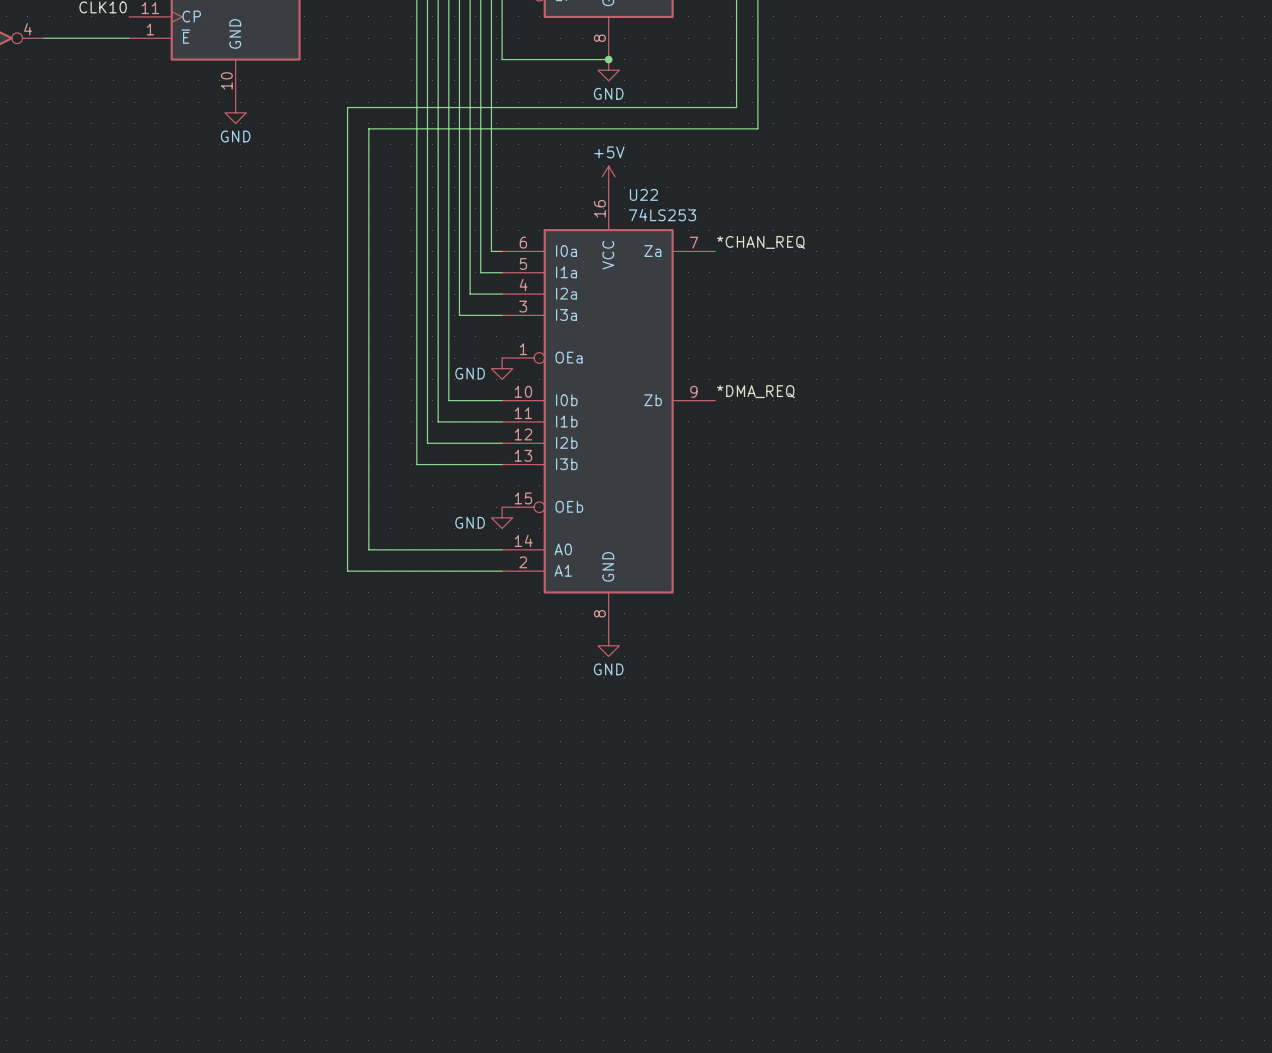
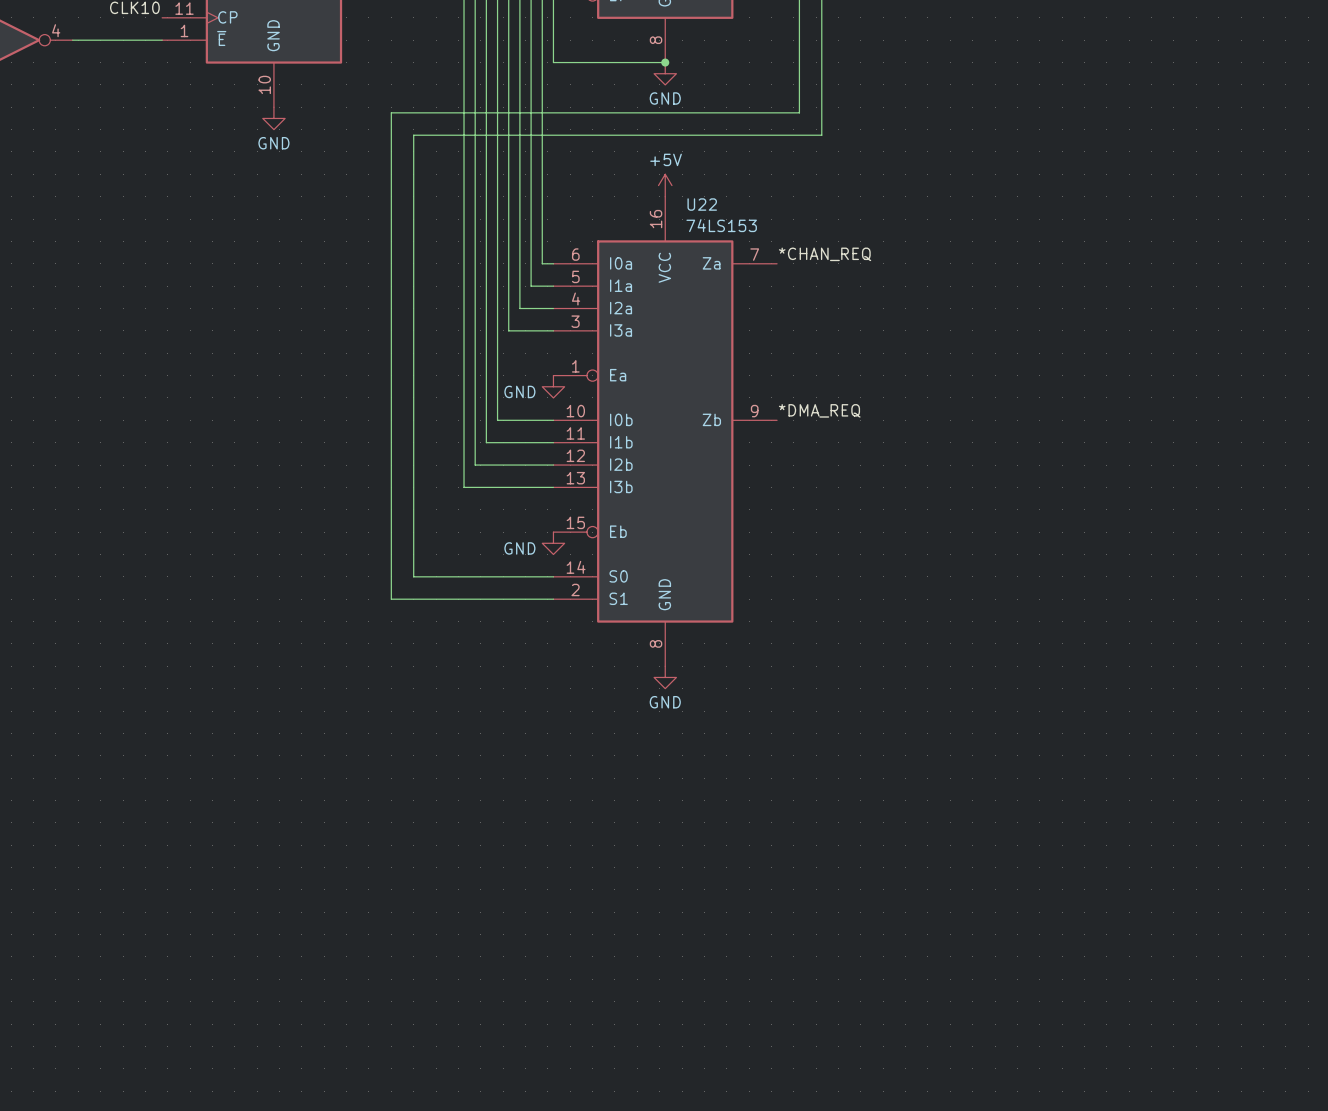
U22 value: 74LS253 (662, 215) -> 74LS153 (721, 225)
U22 pin name: OEa (569, 357) -> Ea (618, 375)
U22 pin name: OEb (569, 506) -> Eb (618, 531)
U22 pin name: A0 (563, 549) -> S0 (618, 576)
U22 pin name: A1 (563, 570) -> S1 (618, 598)

